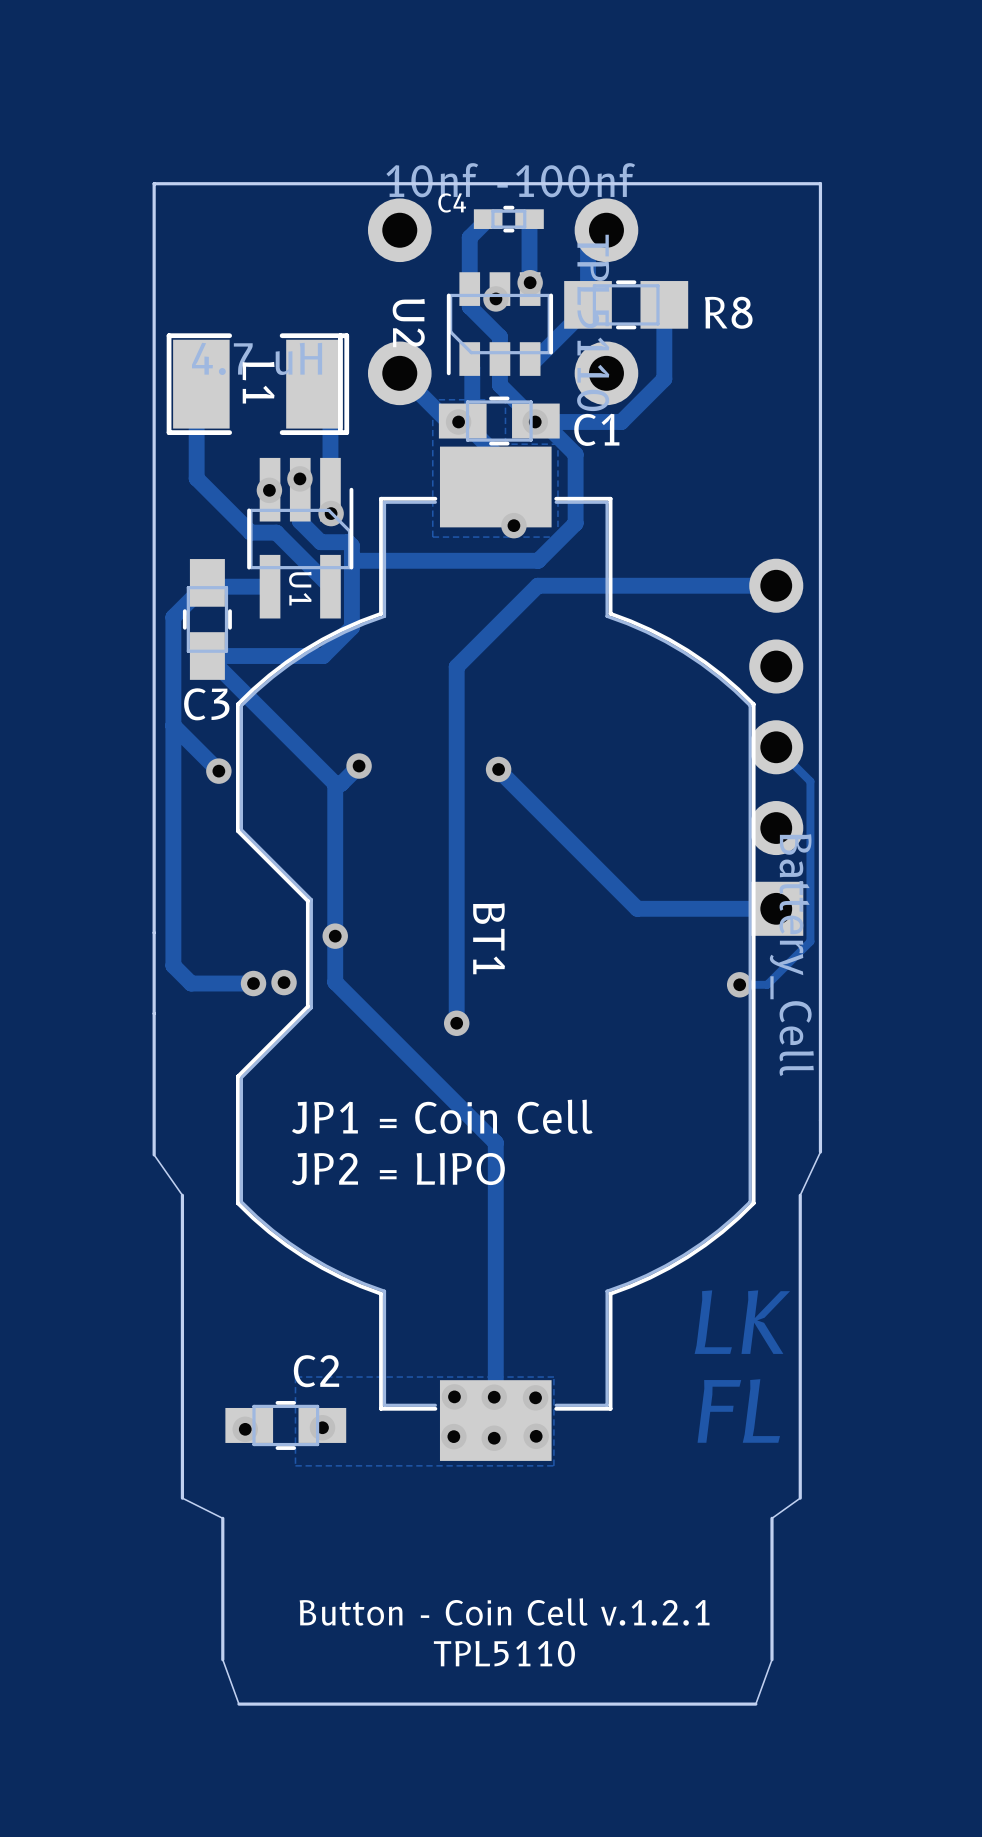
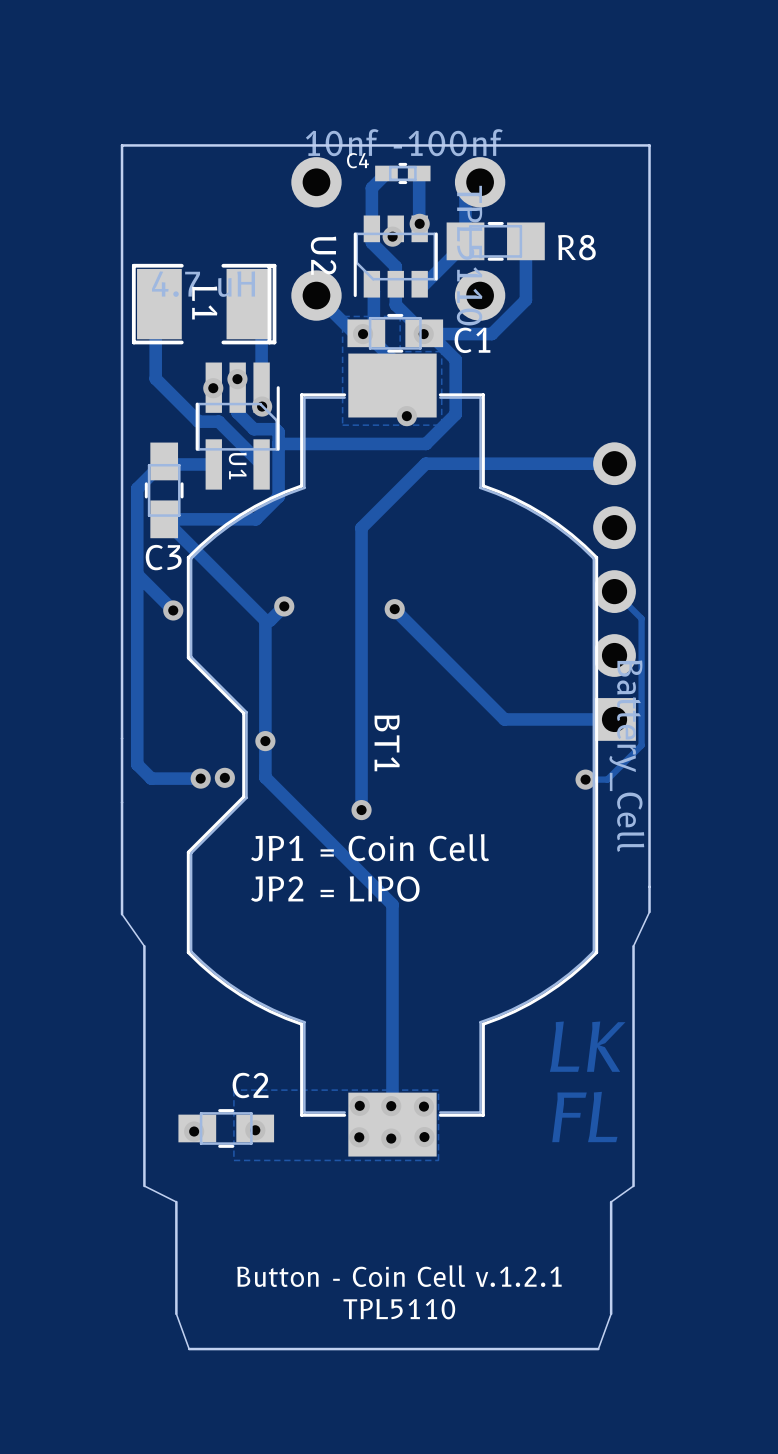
text: none -> JP1 = Coin Cell (370, 847)
text: JP1 = Coin Cell (442, 1116) -> JP2 = LIPO (335, 888)
text: JP2 = LIPO (398, 1169) -> none

